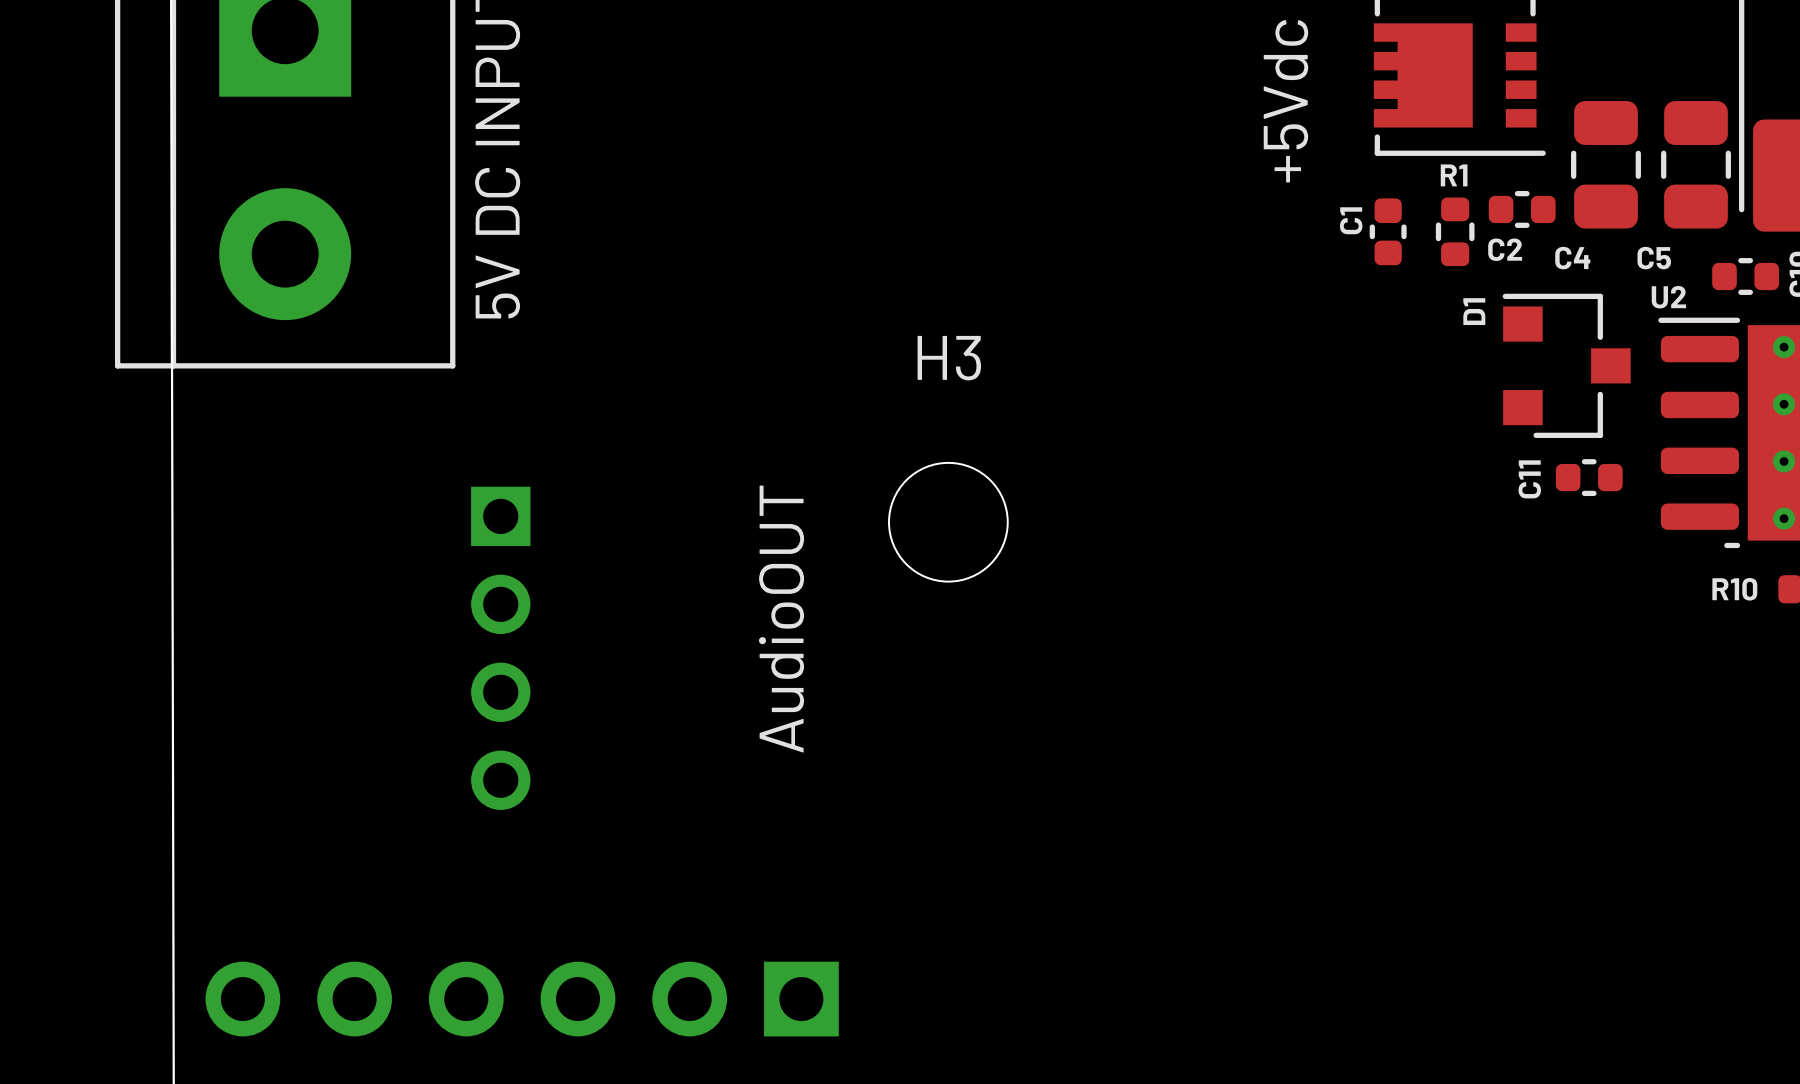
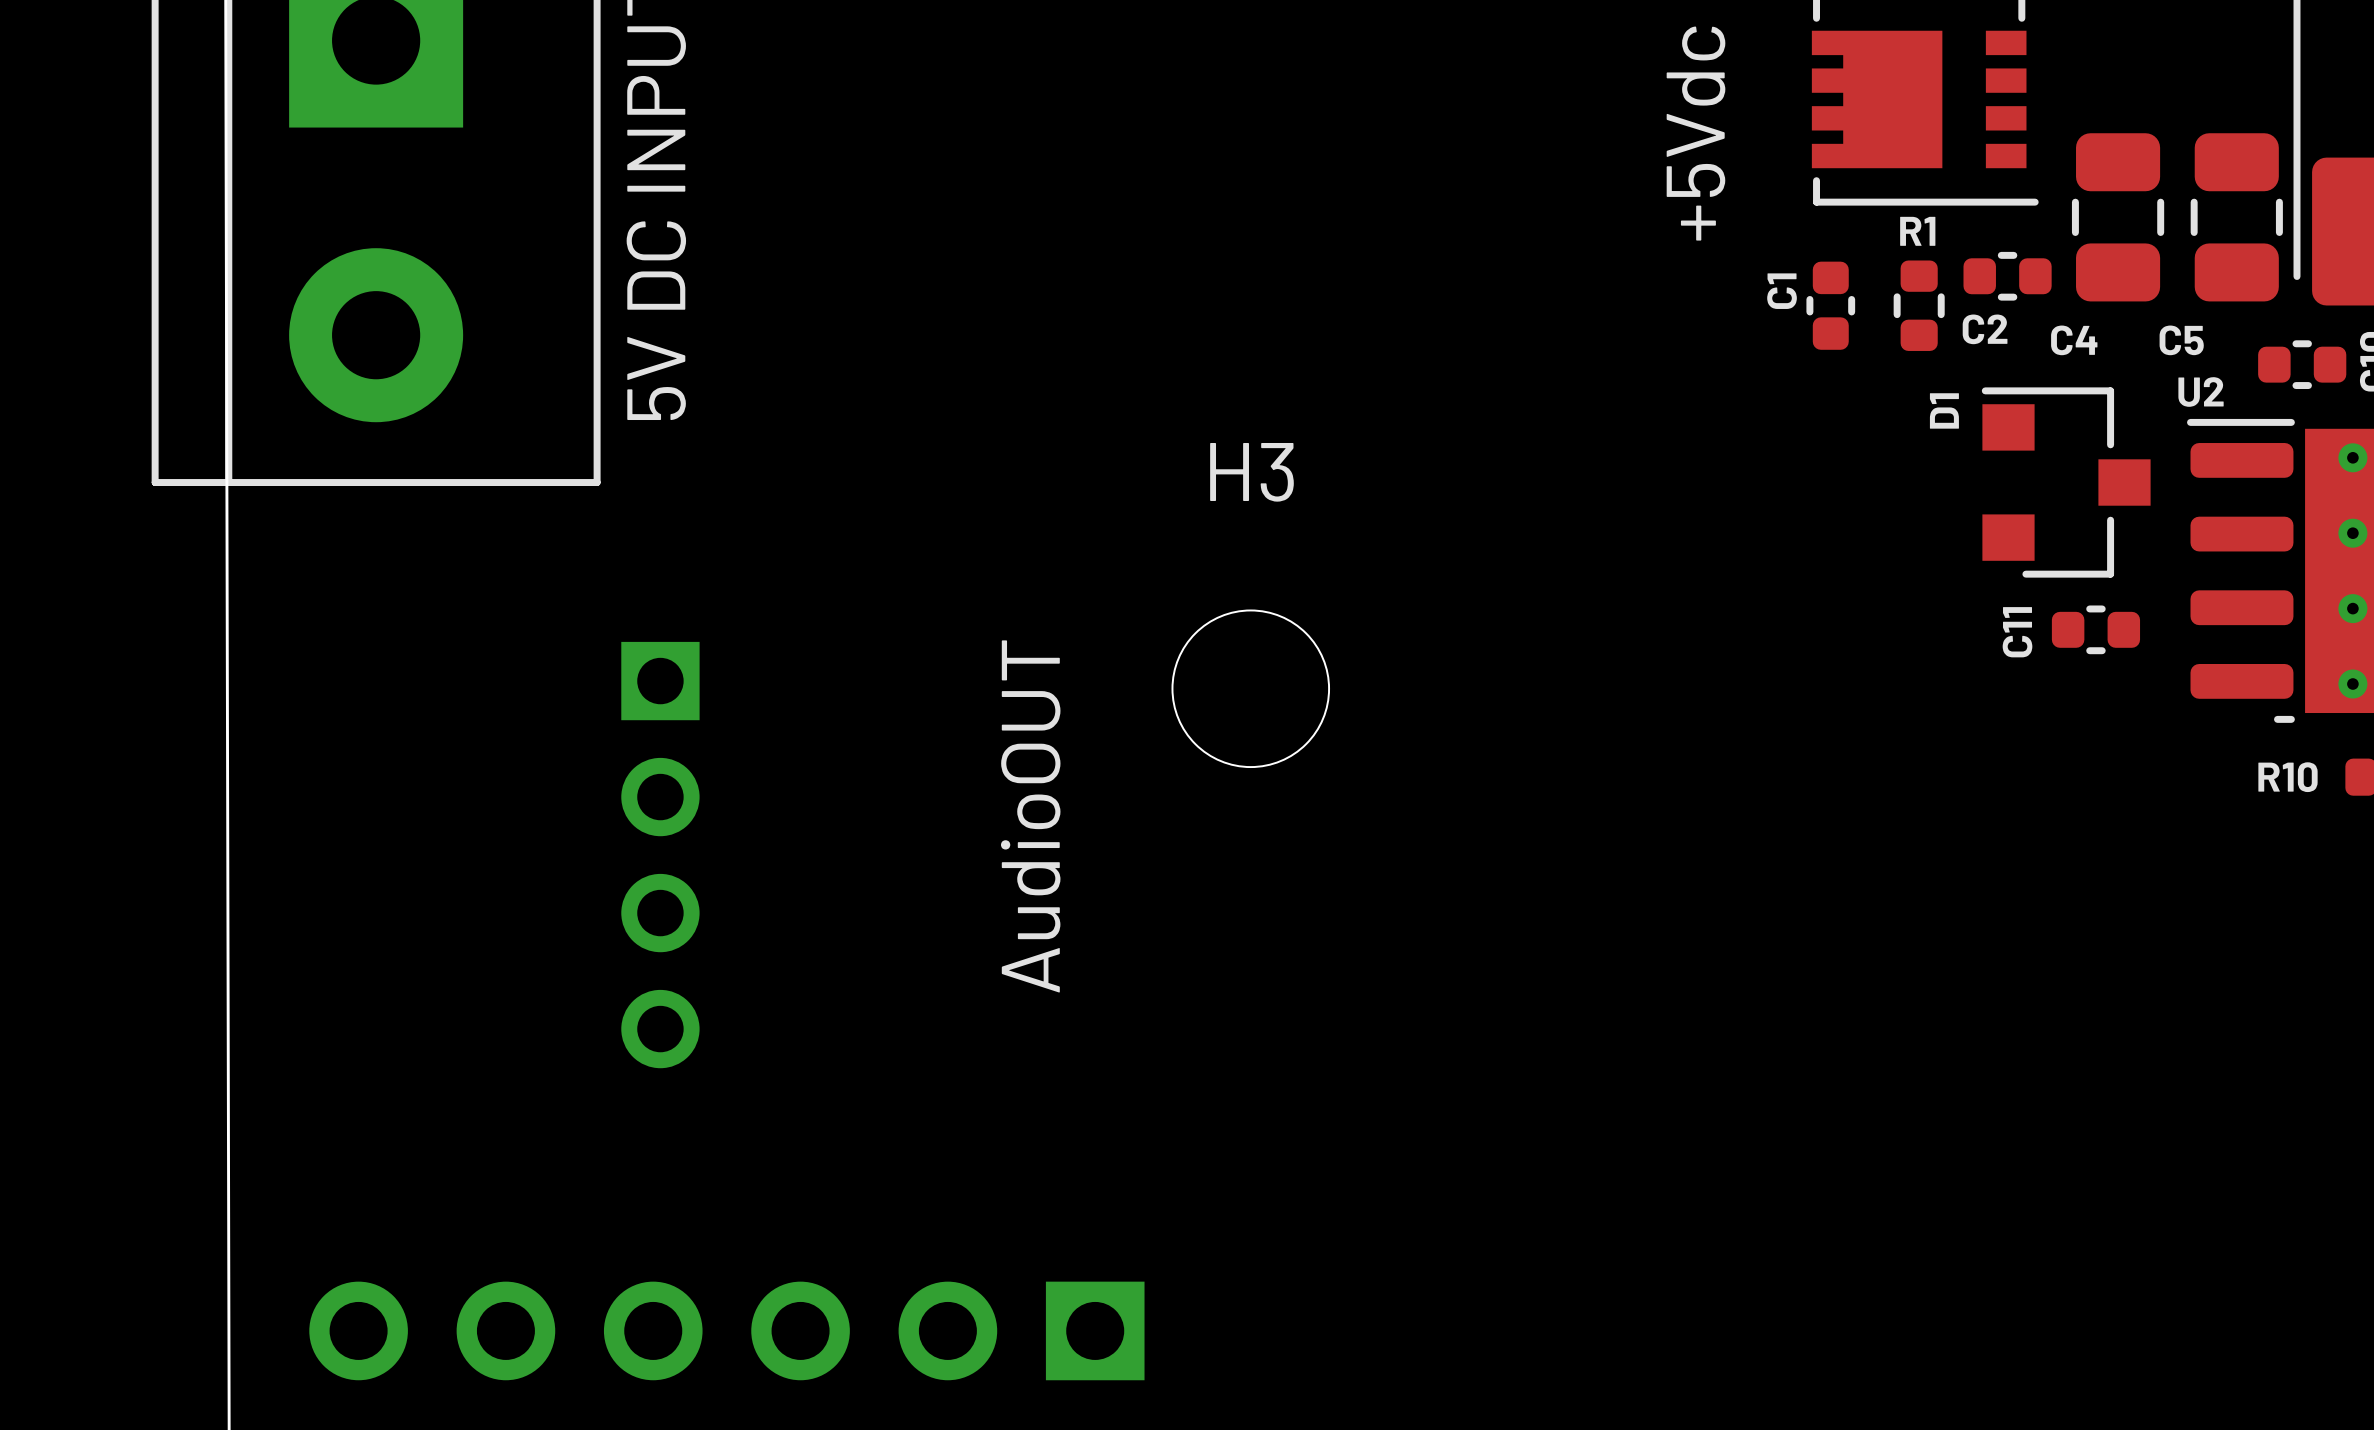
part position: (522, 999) -> (726, 1330)

